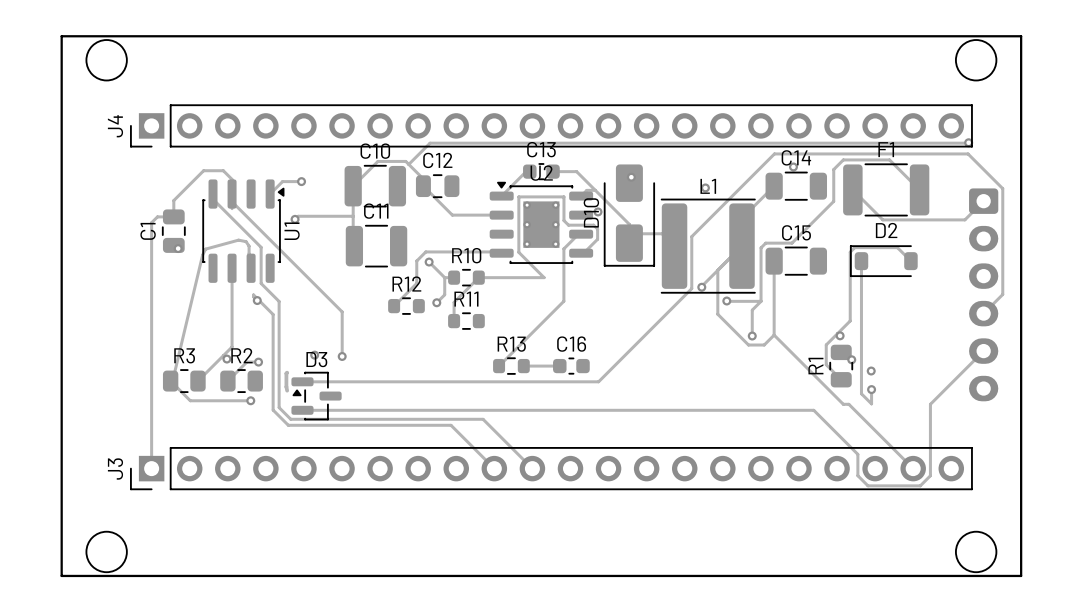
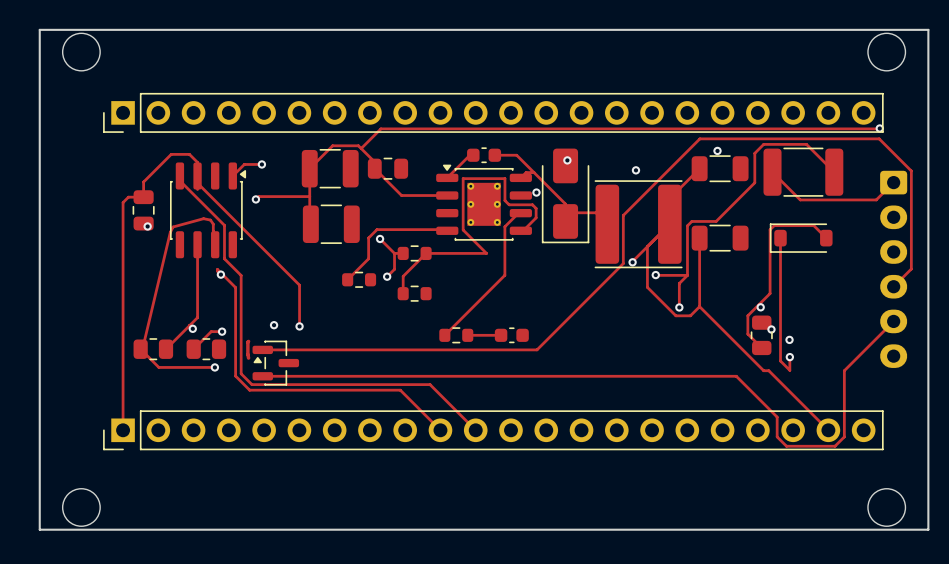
J4 name: J4 (115, 126) -> none
C13 name: C13 (541, 149) -> none
F1 name: F1 (886, 149) -> none
C10 name: C10 (375, 151) -> none
C14 name: C14 (796, 157) -> none
C12 name: C12 (437, 160) -> none
U2 name: U2 (541, 173) -> none
L1 name: L1 (708, 186) -> none
C11 name: C11 (376, 211) -> none
D10 name: D10 (591, 212) -> none
D2 name: D2 (886, 230) -> none
C1 name: C1 (148, 231) -> none
U1 name: U1 (292, 231) -> none
C15 name: C15 (796, 232) -> none
R10 name: R10 (466, 255) -> none
R12 name: R12 (406, 284) -> none
R11 name: R11 (466, 299) -> none
R13 name: R13 (511, 344) -> none
C16 name: C16 (571, 344) -> none
R3 name: R3 (184, 355) -> none
R2 name: R2 (241, 355) -> none
D3 name: D3 (316, 359) -> none
R1 name: R1 (815, 366) -> none
J3 name: J3 (115, 469) -> none

